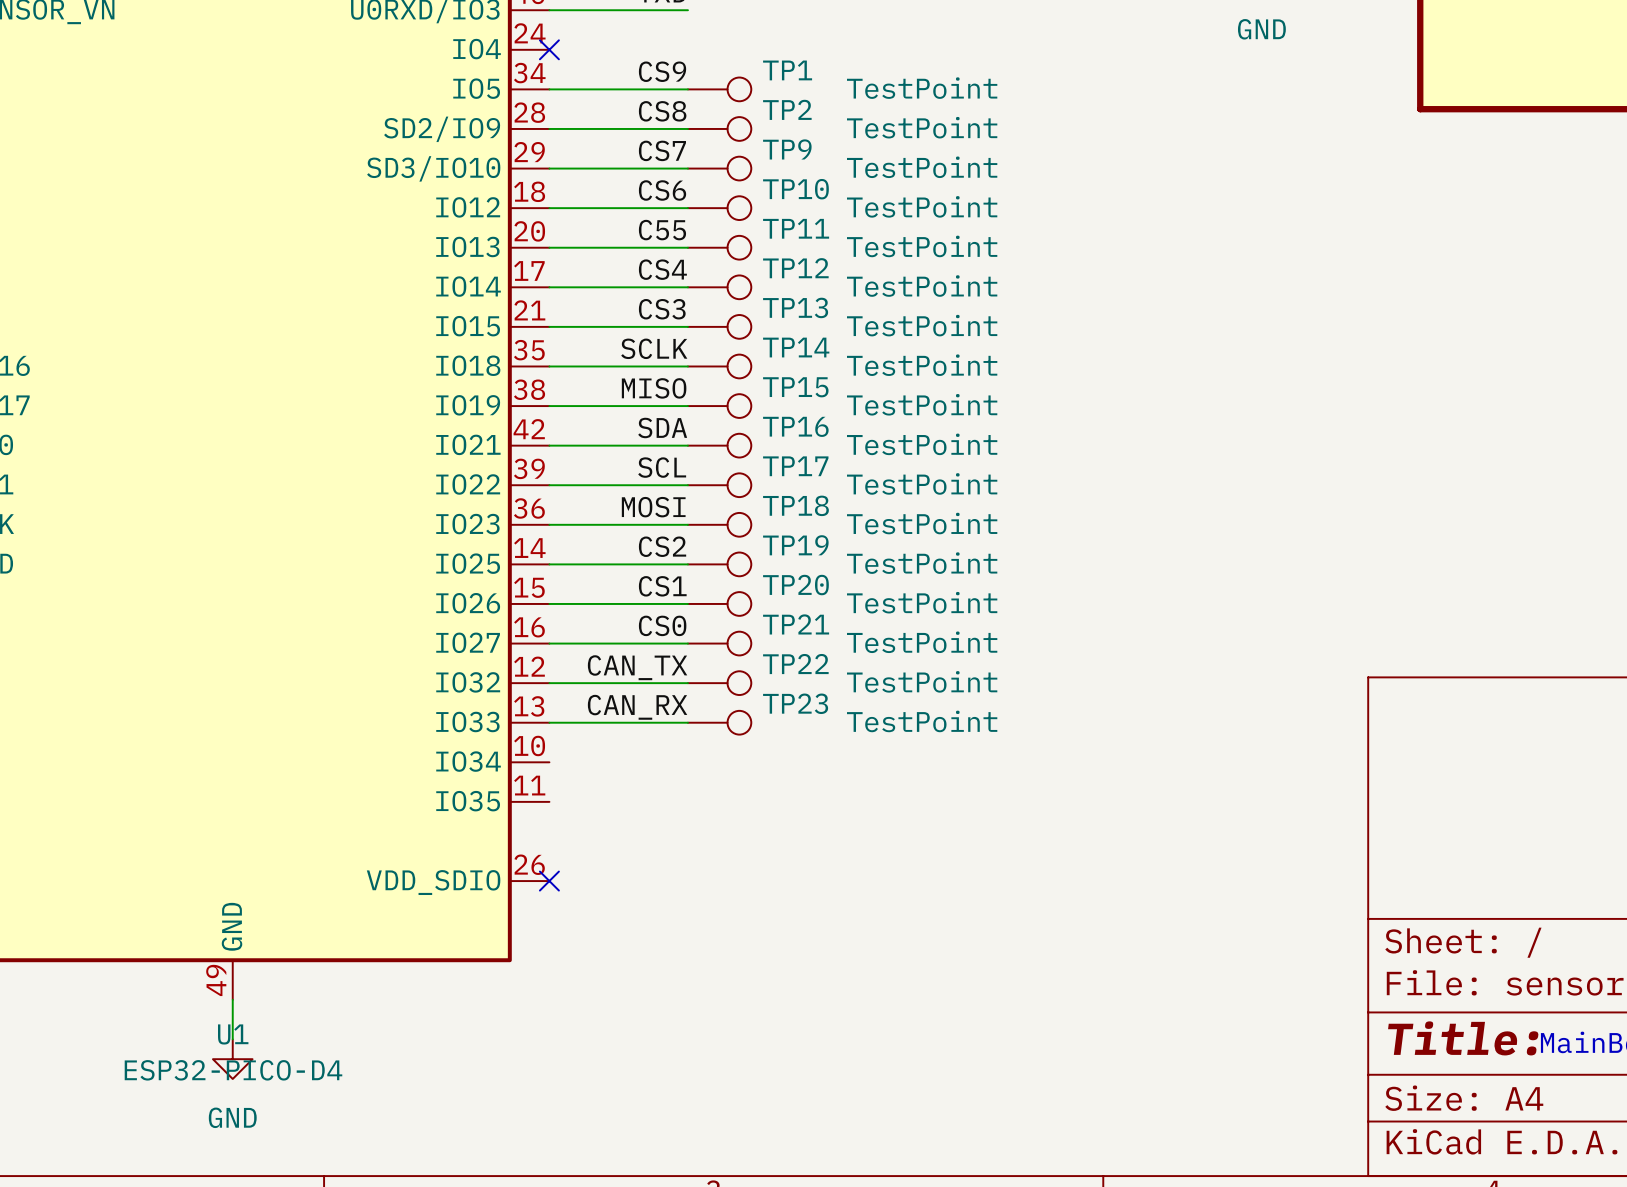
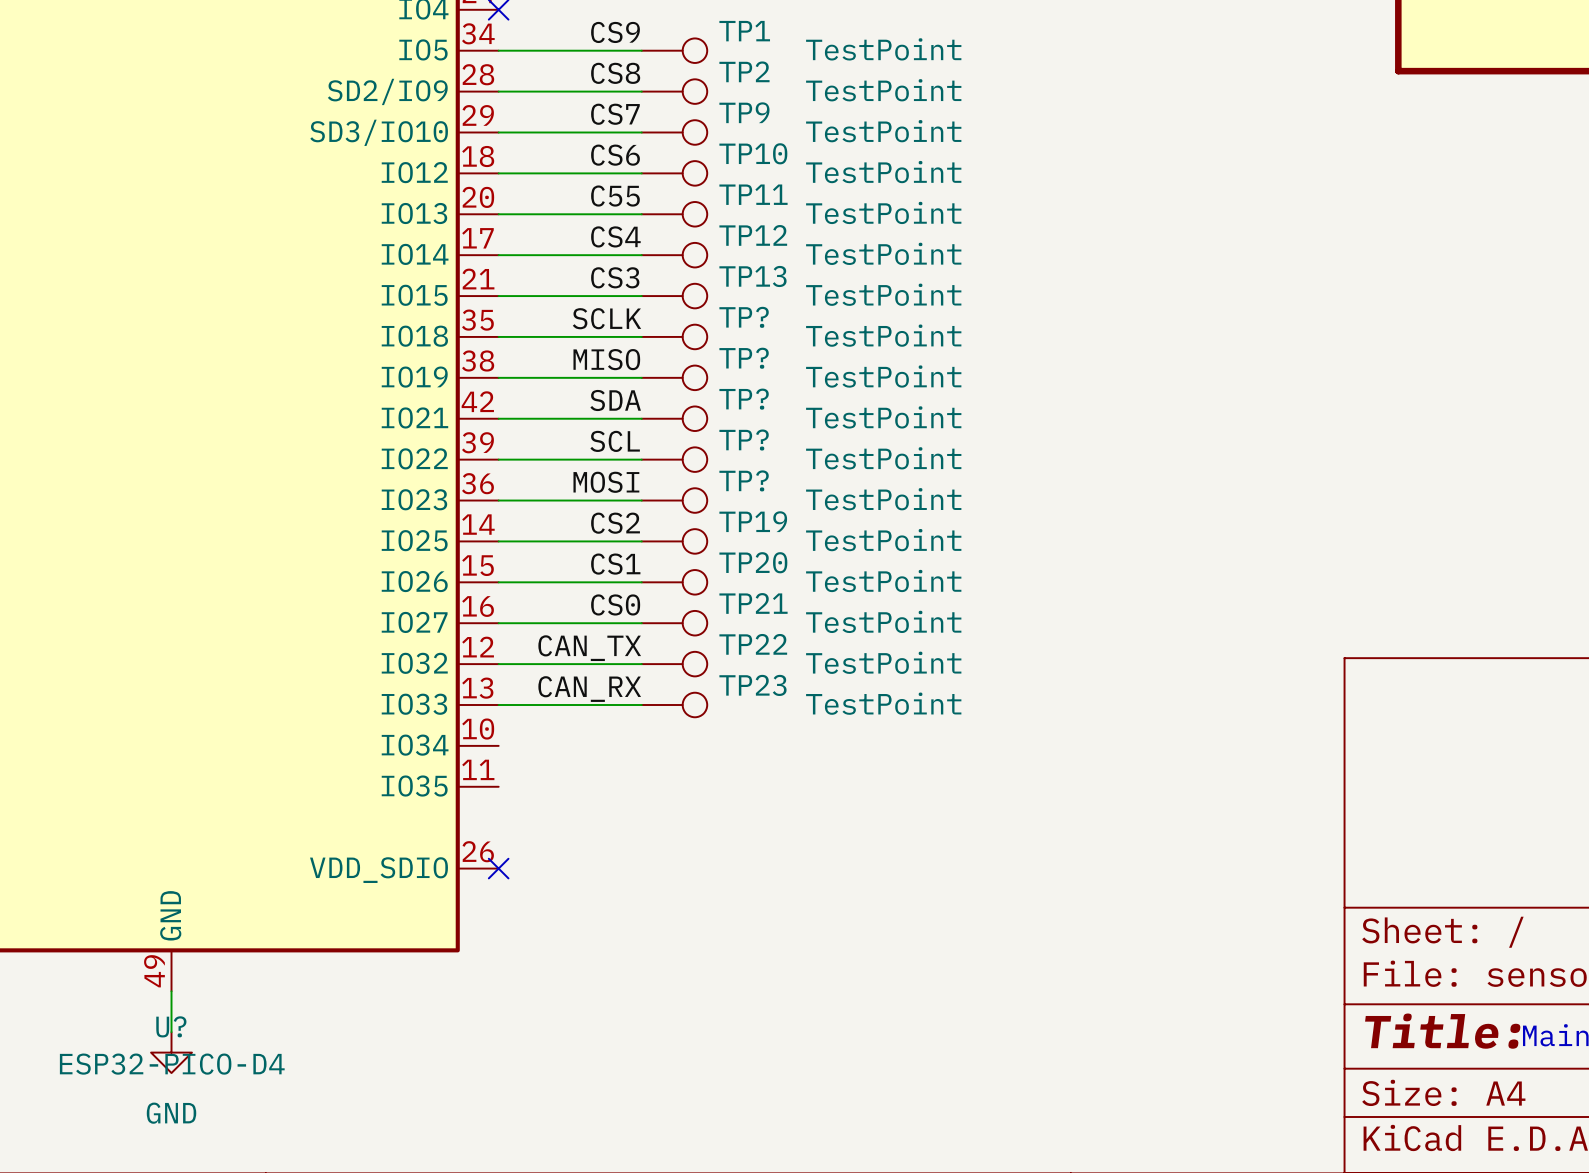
TP14 name: TP14 (796, 347) -> TP? (744, 317)
TP15 name: TP15 (795, 387) -> TP? (744, 358)
TP16 name: TP16 (795, 426) -> TP? (744, 399)
TP17 name: TP17 (795, 466) -> TP? (744, 440)
TP18 name: TP18 (795, 505) -> TP? (744, 480)
U1 name: U1 (233, 1034) -> U? (171, 1026)

